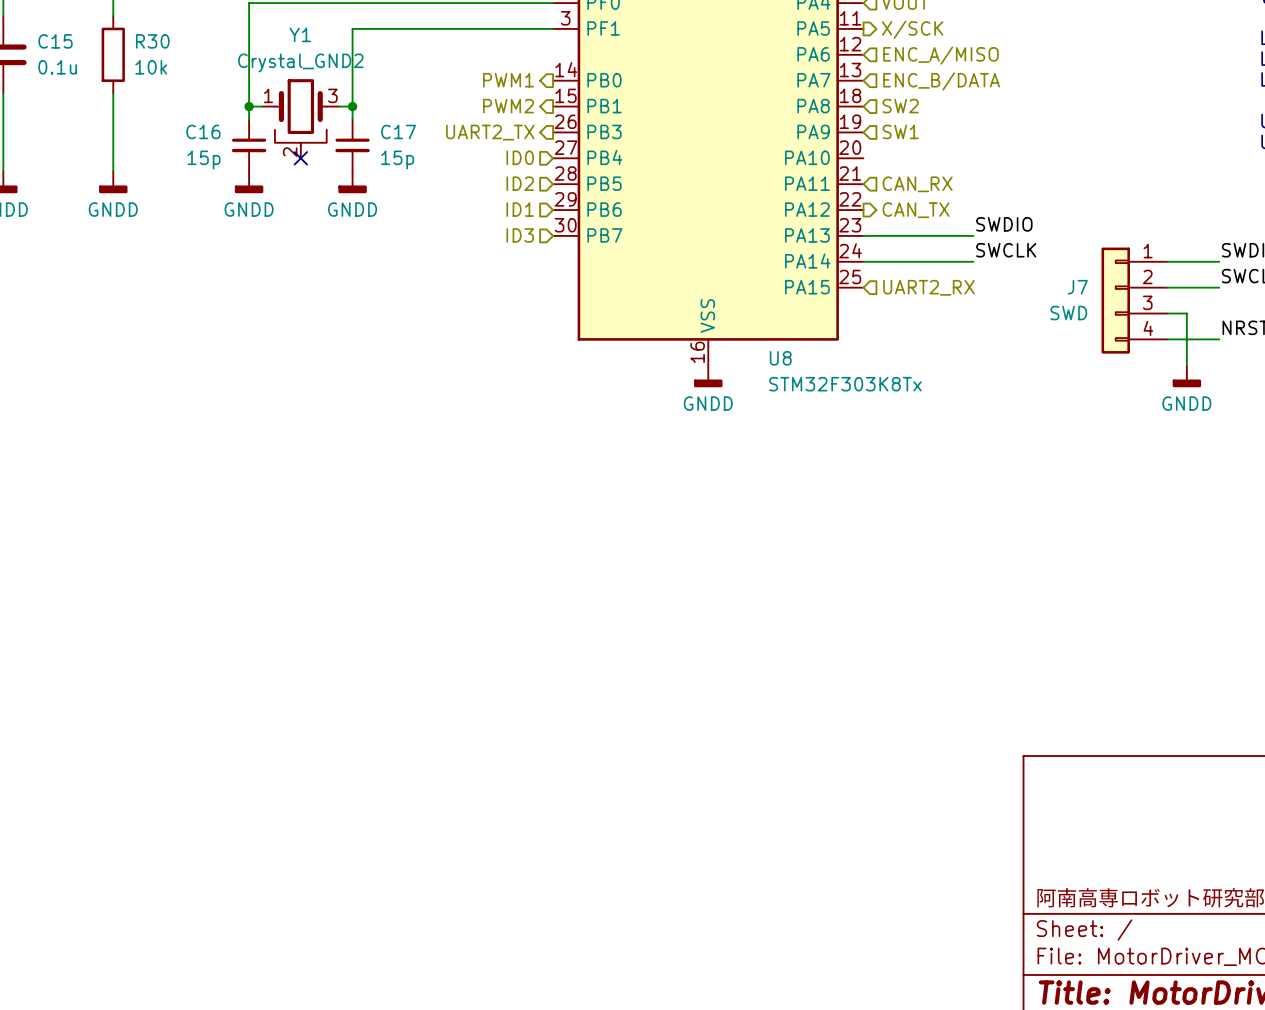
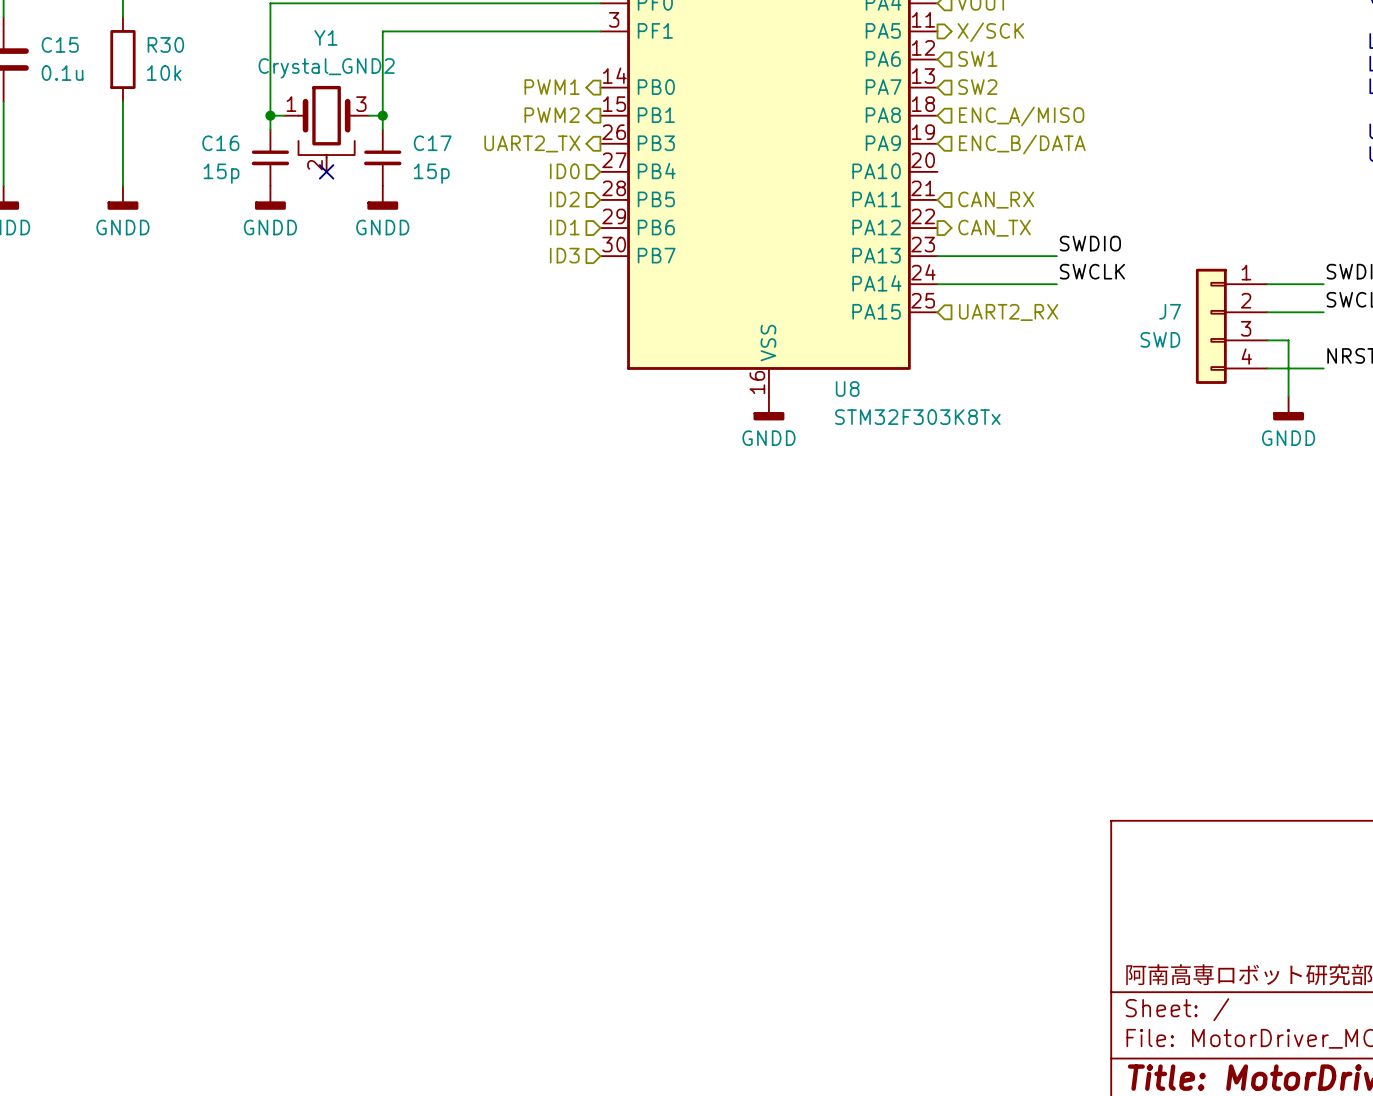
hierarchical label: ENC_A/MISO (941, 55) -> SW1 (977, 59)
hierarchical label: ENC_B/DATA (941, 81) -> SW2 (977, 87)
hierarchical label: SW2 (900, 106) -> ENC_A/MISO (1021, 116)
hierarchical label: SW1 (900, 131) -> ENC_B/DATA (1022, 144)

